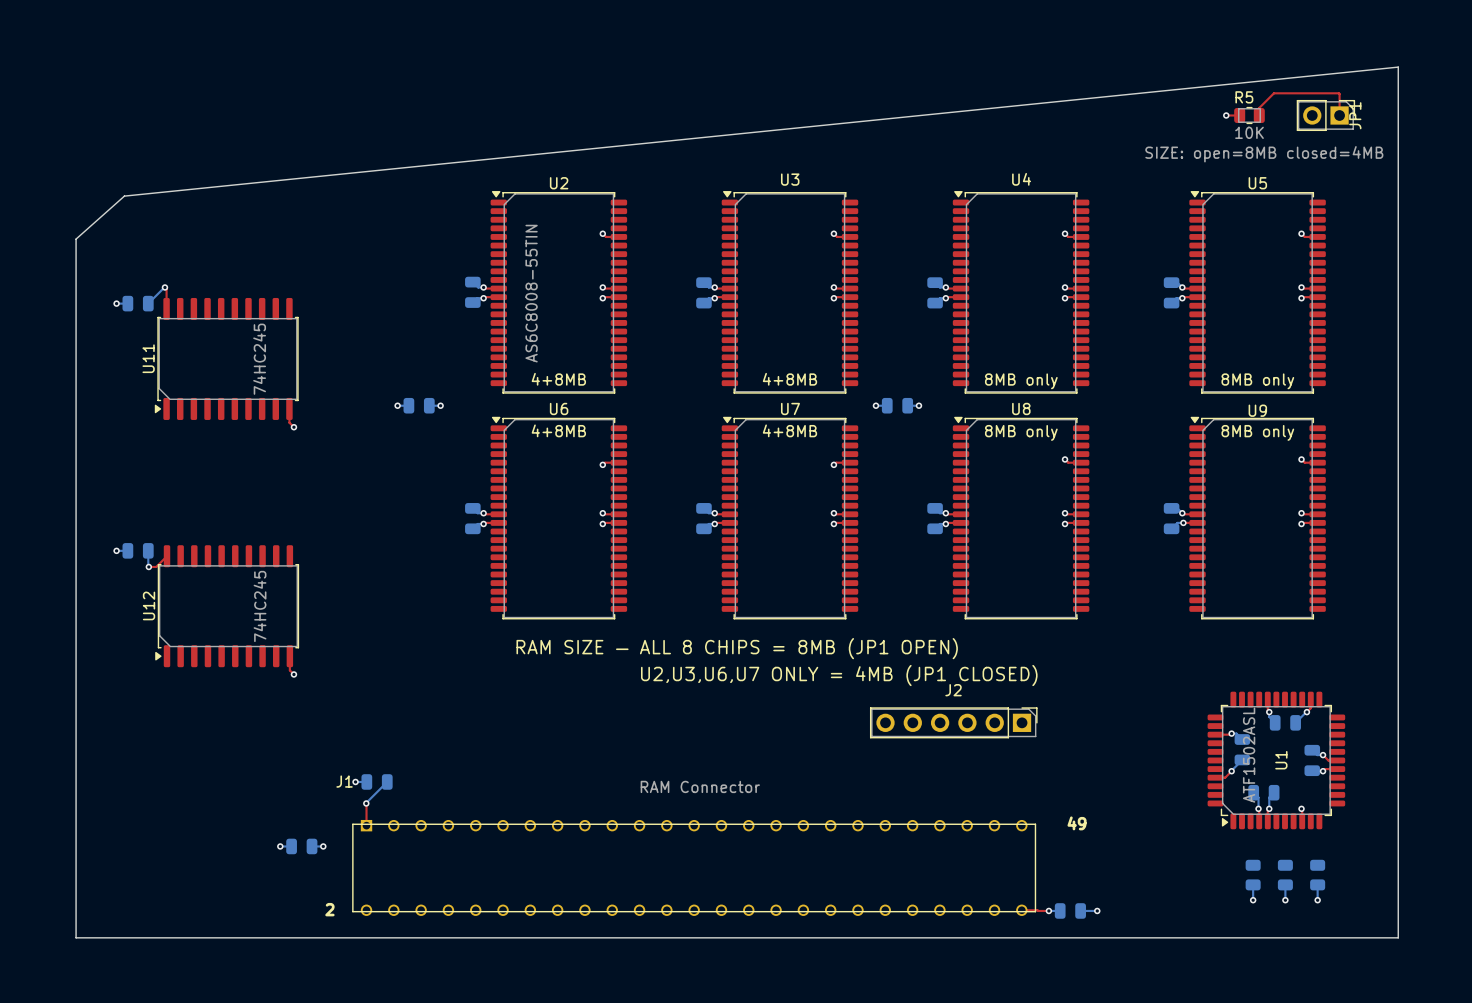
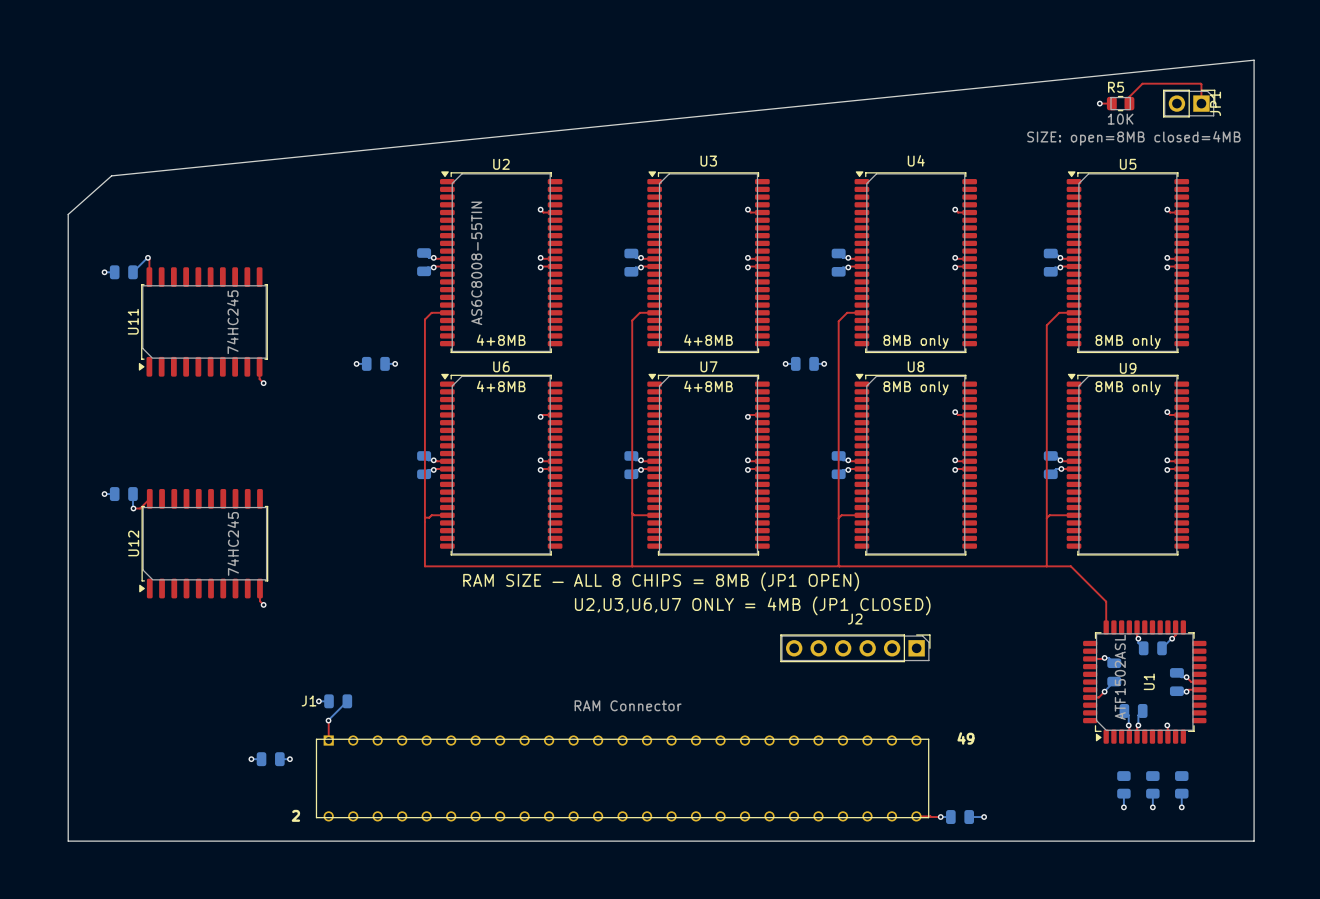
top track: none -> (447, 312) (431, 312) (424, 319) (424, 566) (1070, 566) (1106, 601) (1106, 627)
top track: none -> (654, 312) (639, 312) (632, 320) (632, 566)
top track: none -> (861, 312) (847, 312) (838, 321) (839, 566)
top track: none -> (1074, 312) (1059, 312) (1046, 325) (1046, 566)
top track: none -> (632, 513) (634, 515) (654, 515)
top track: none -> (447, 515) (431, 515) (424, 517)
top track: none -> (861, 515) (841, 515) (838, 518)
top track: none -> (1074, 515) (1049, 515) (1046, 518)

